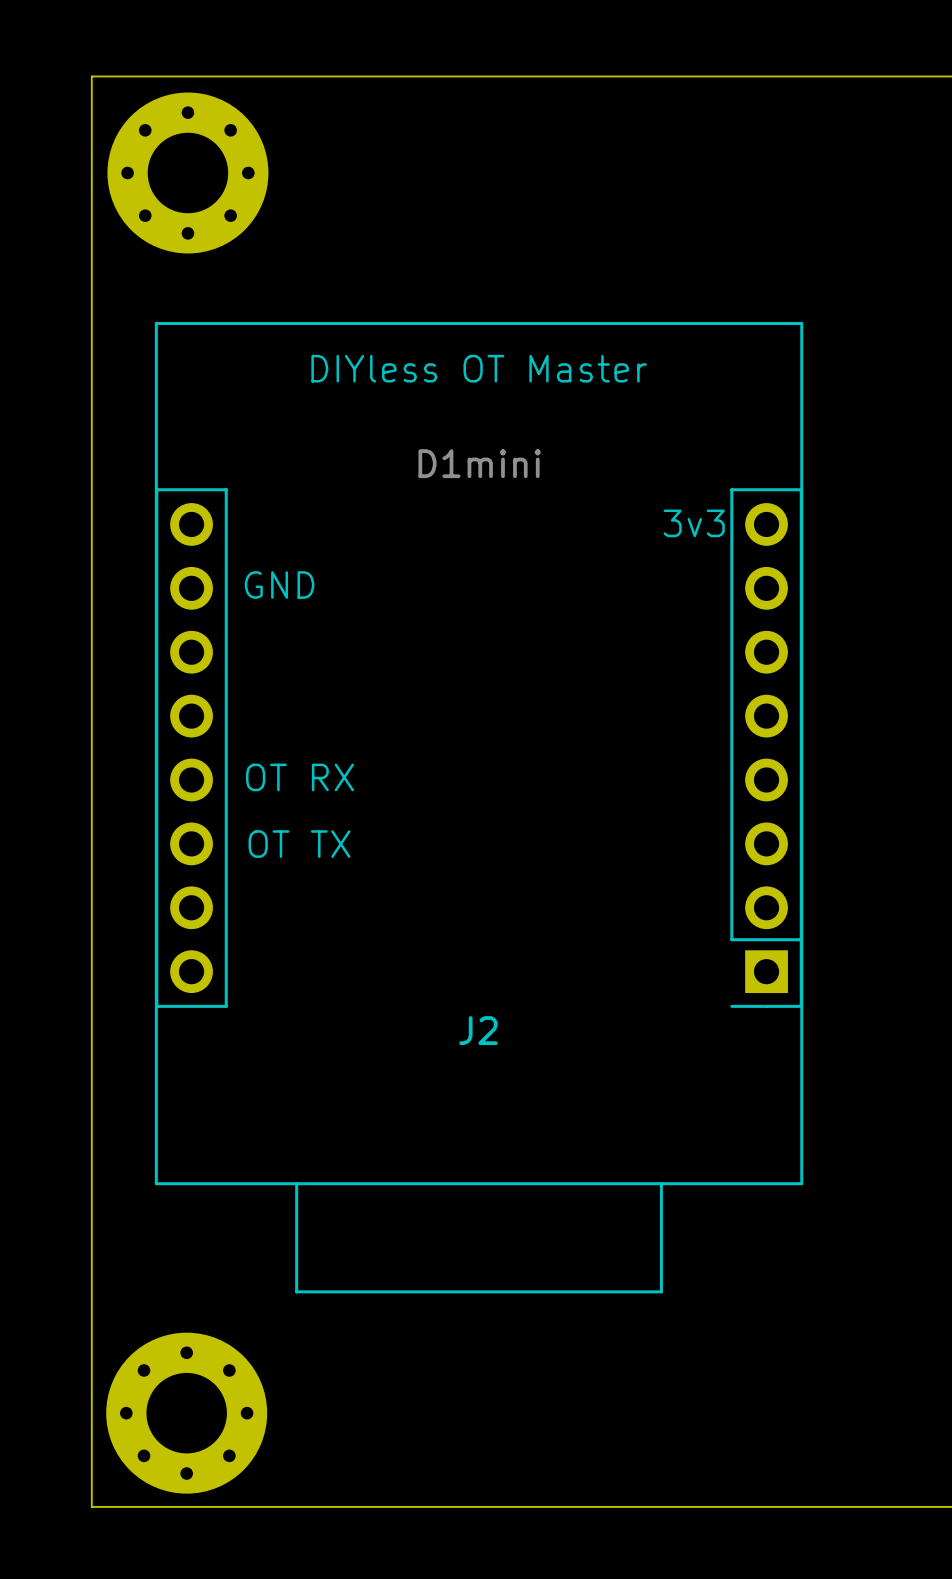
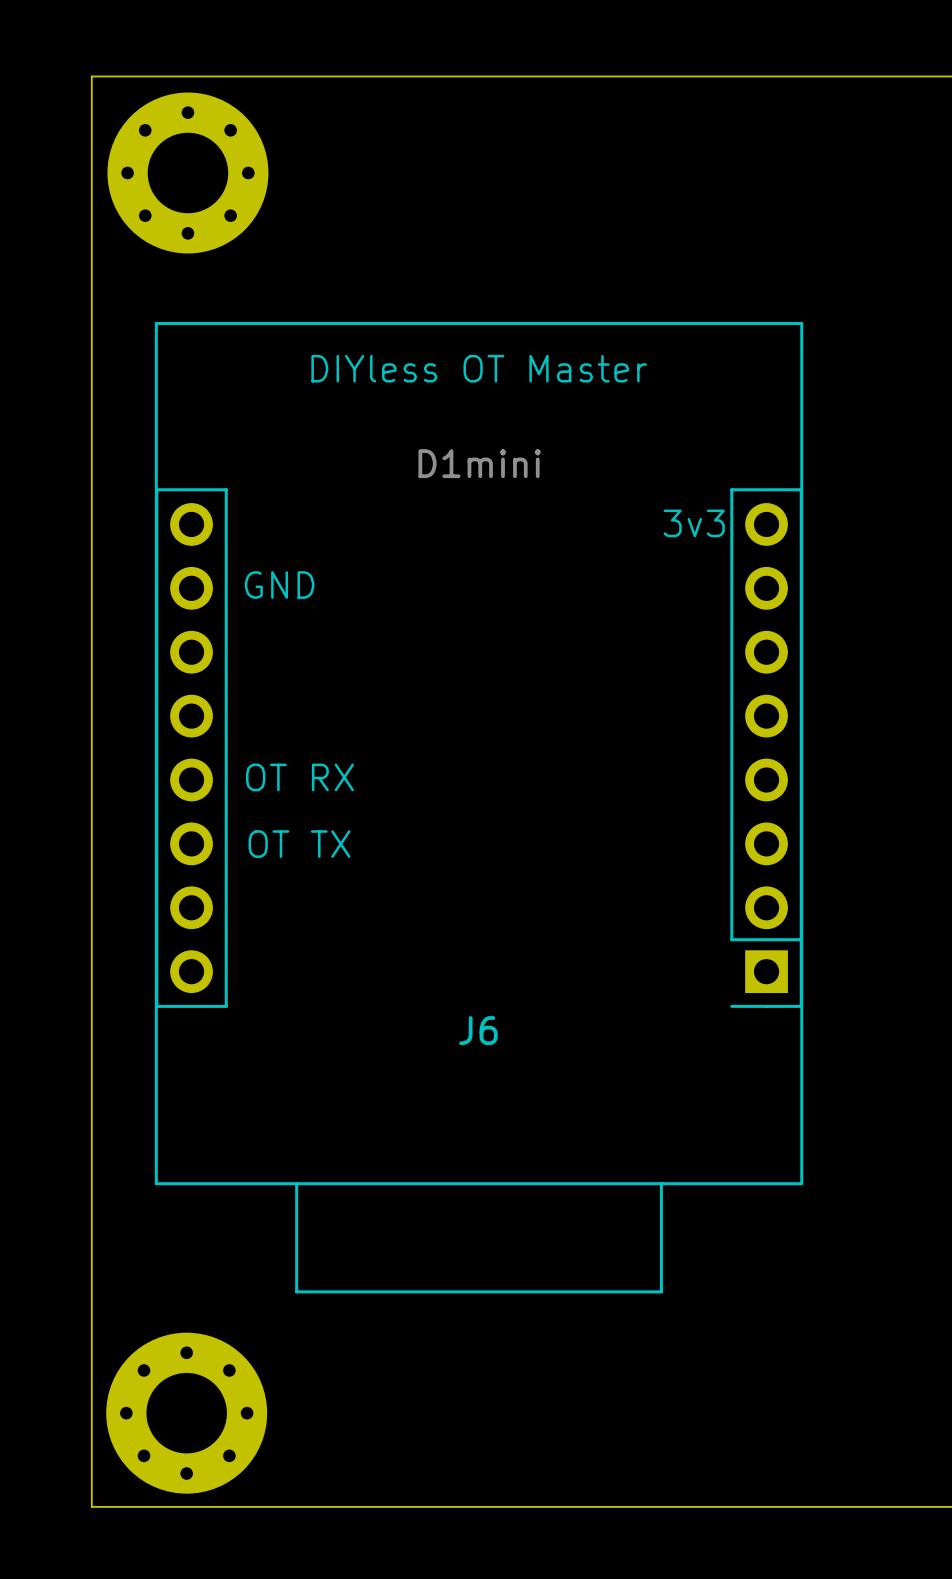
J2 name: J2 (478, 1030) -> J6 (478, 1030)

